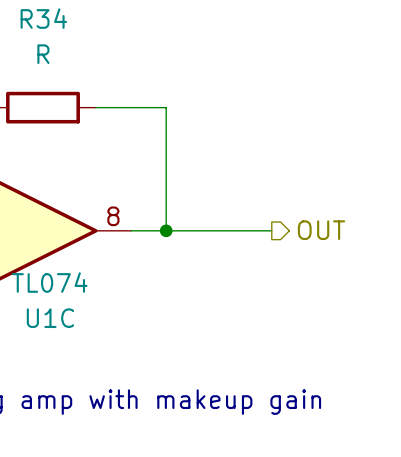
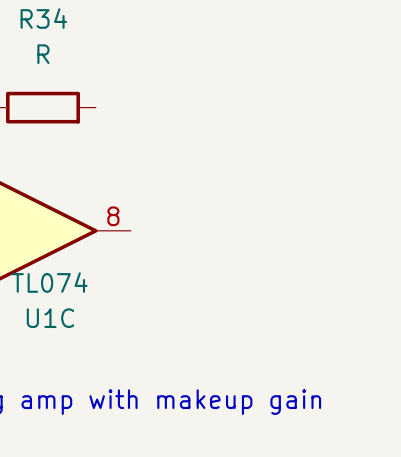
wire: (95, 107) (166, 107) (166, 230) -> none
wire: (131, 230) (271, 230) -> none
junction: (166, 230) -> none
hierarchical label: OUT (321, 230) -> none

